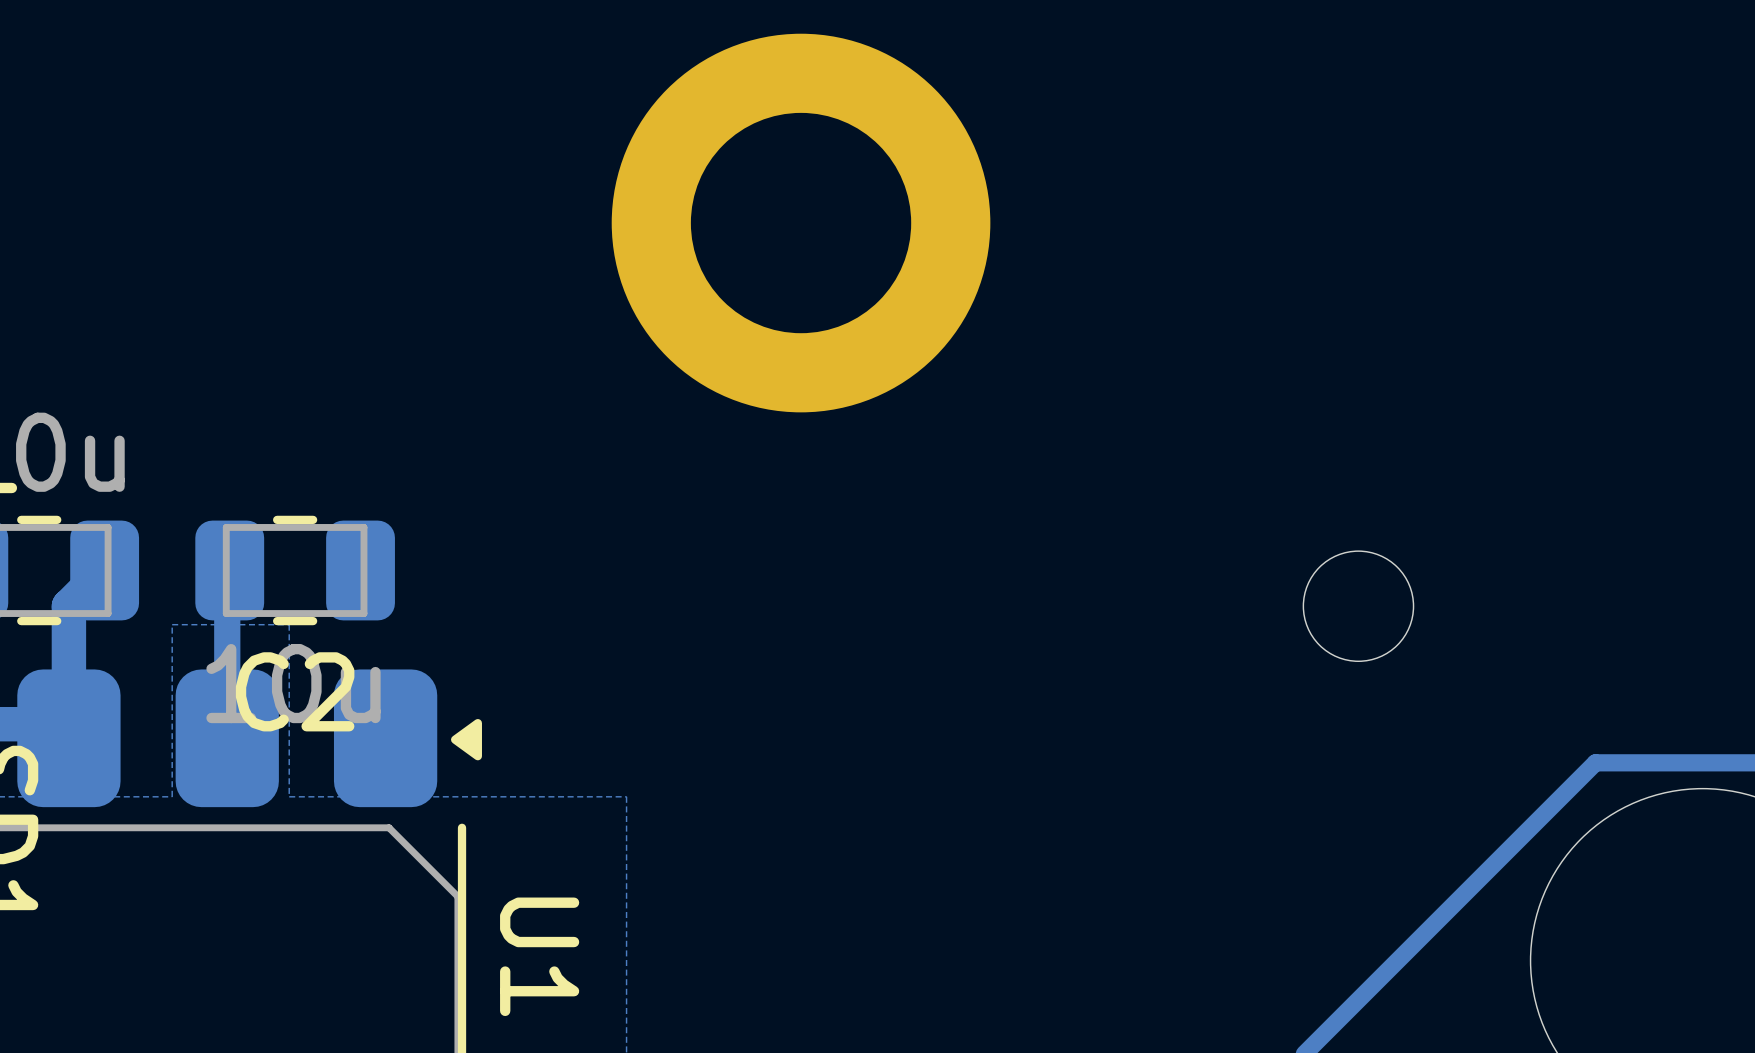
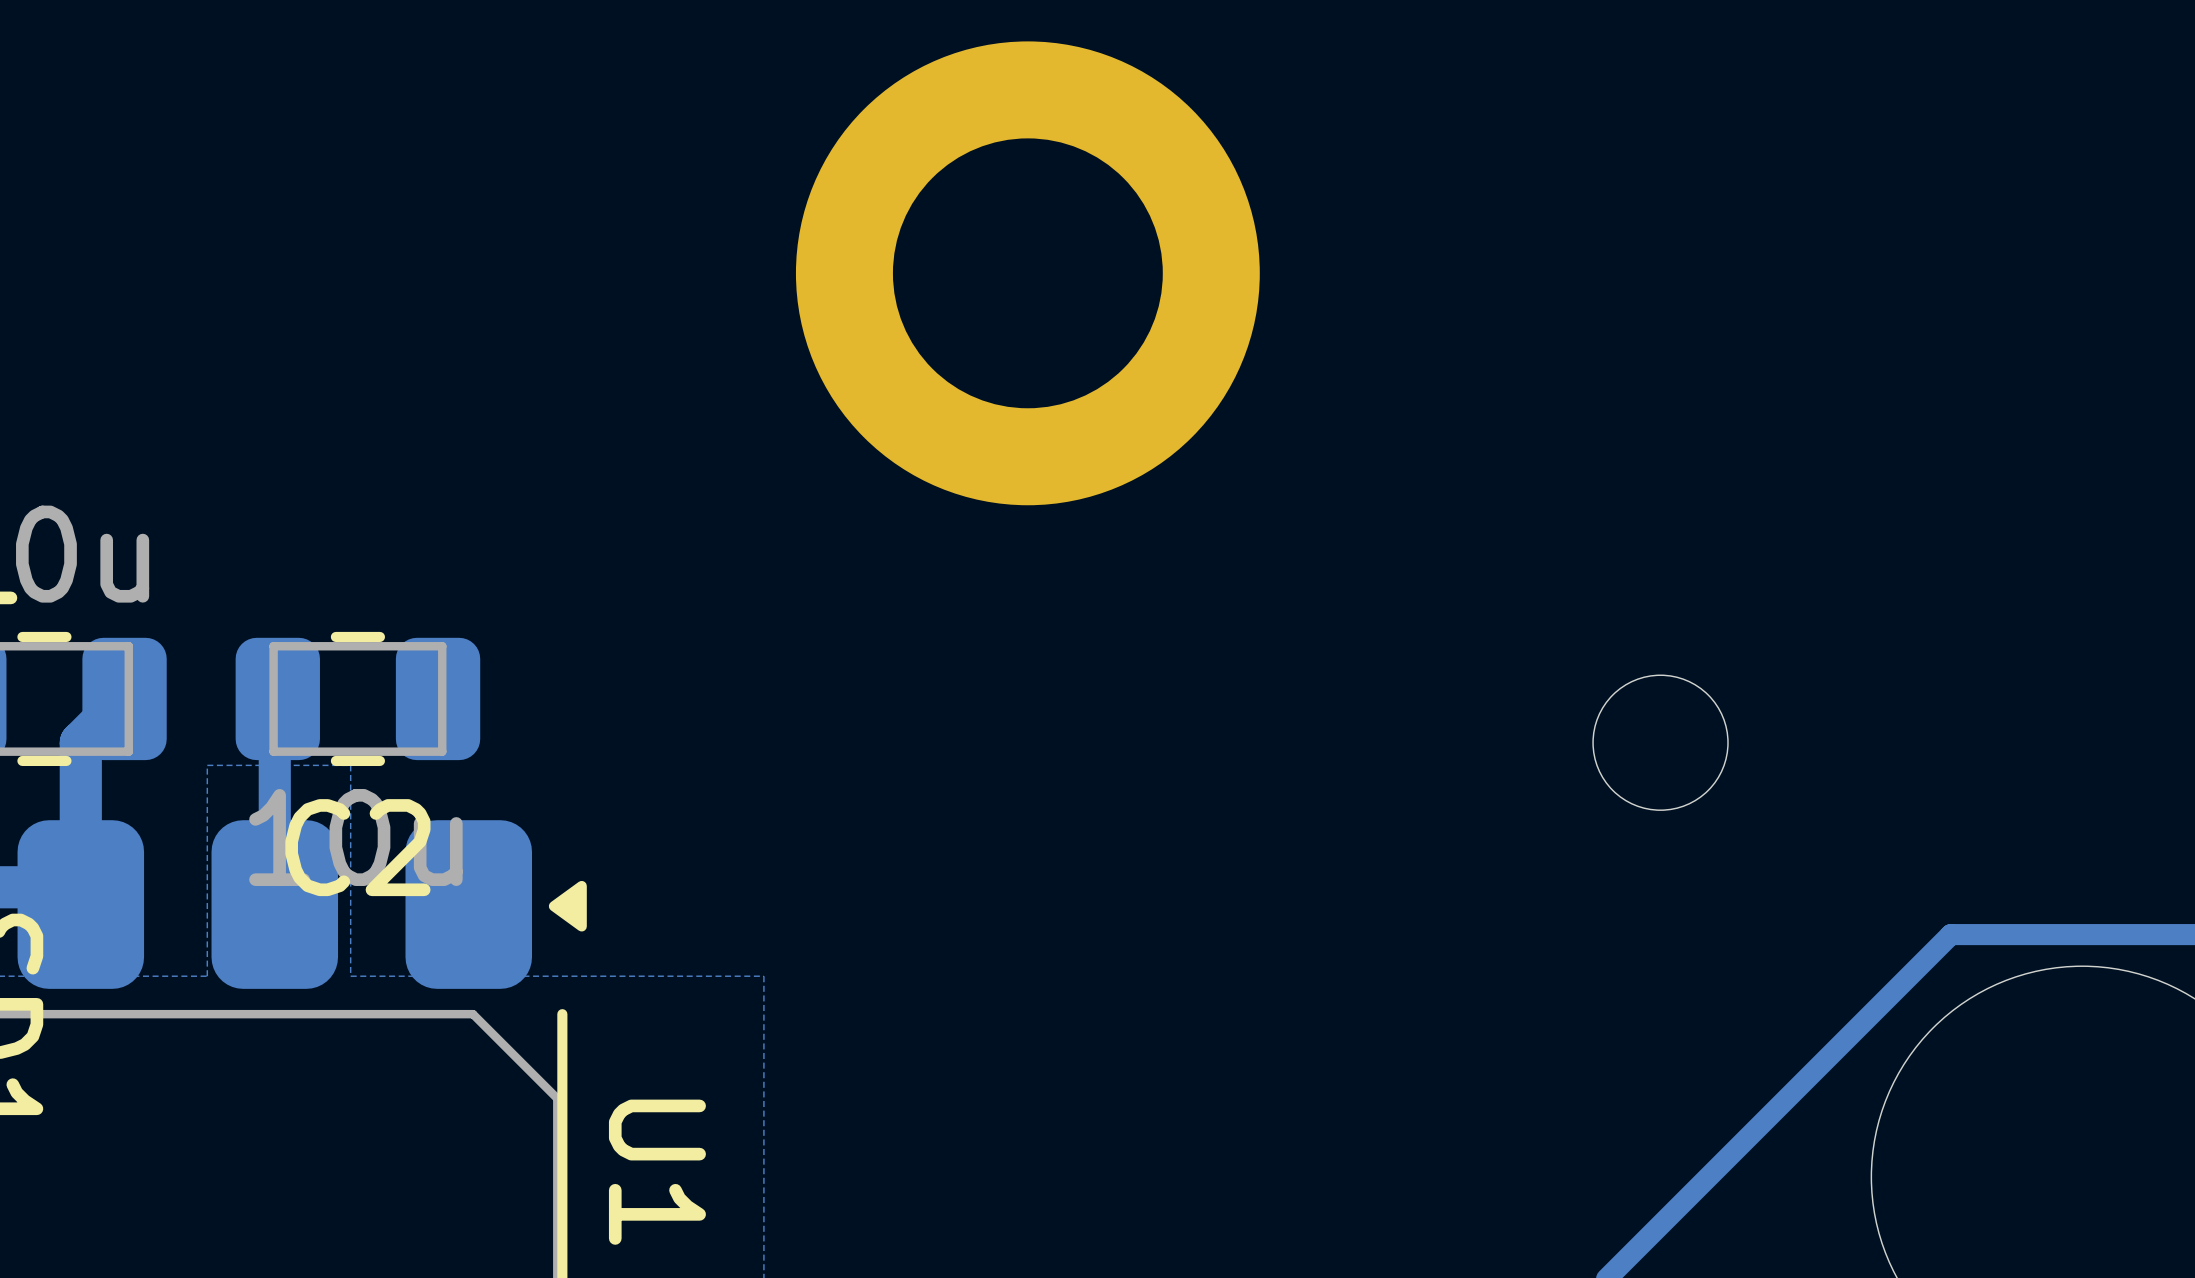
part position: (801, 223) -> (1027, 273)

